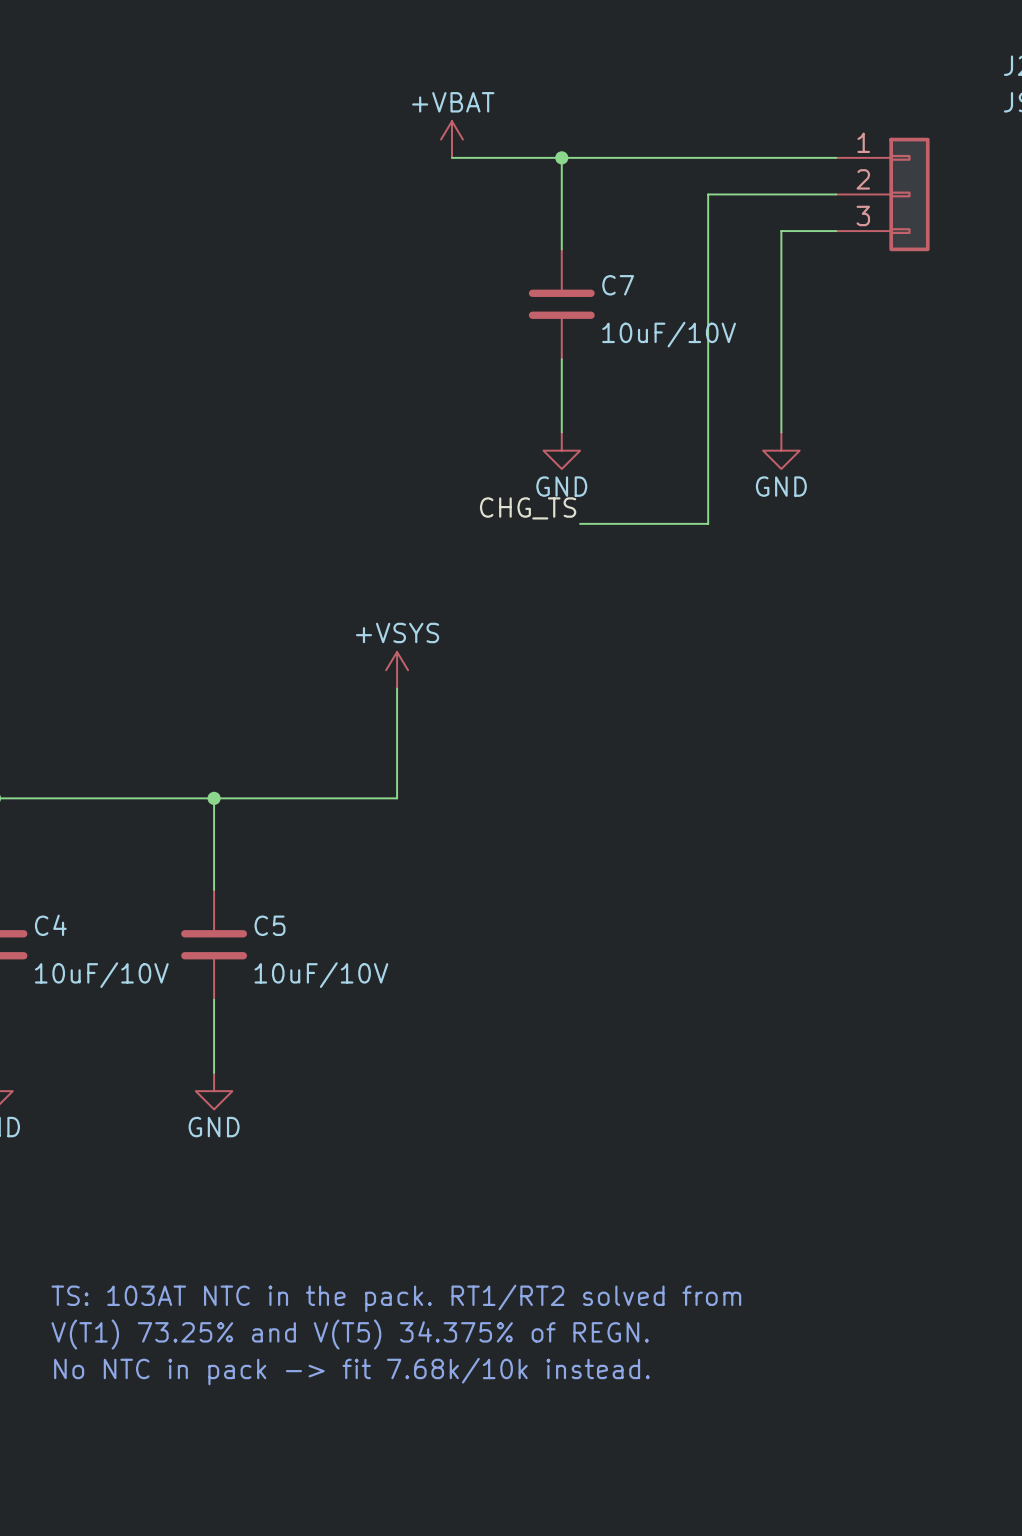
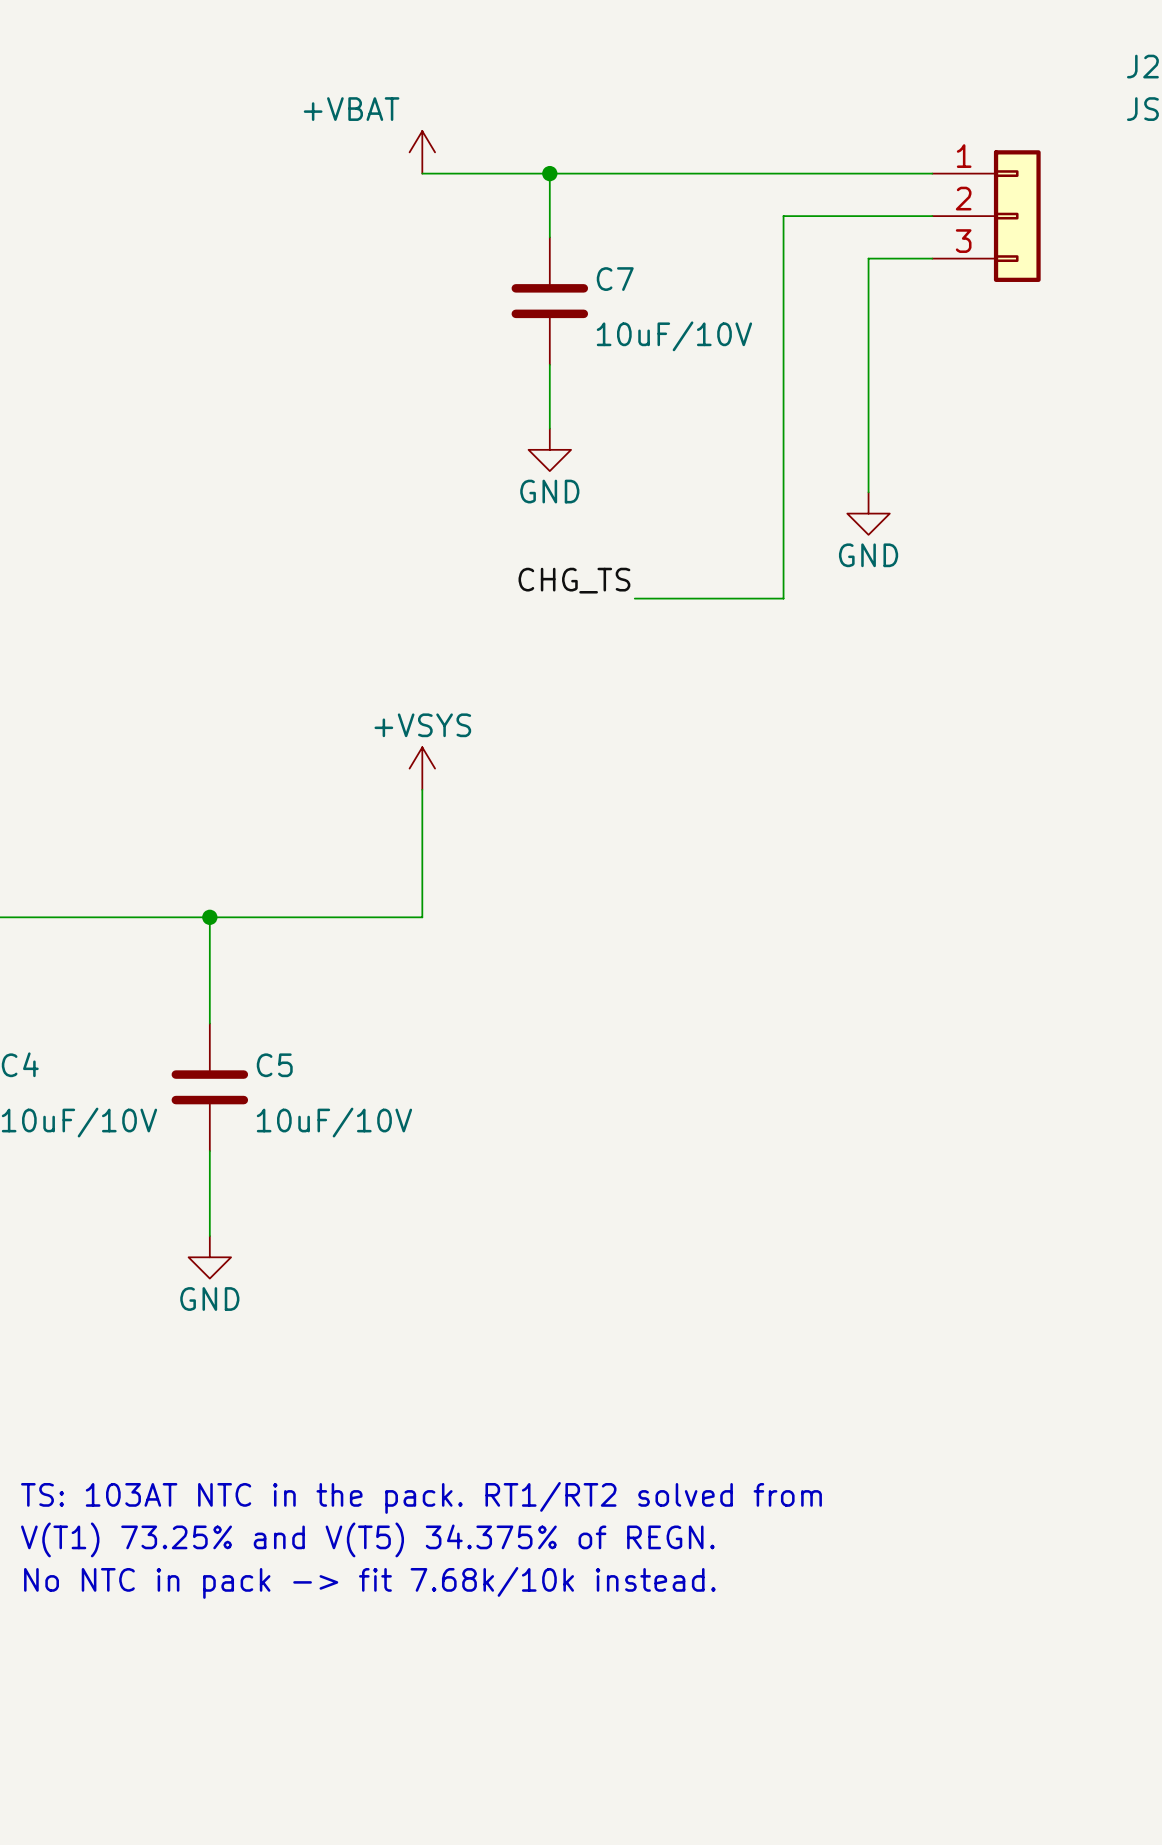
power symbol text position: +VBAT (453, 102) -> +VBAT (351, 109)
power symbol position: +VBAT (451, 139) -> +VBAT (422, 152)
wire: none -> (422, 173) (486, 173)
wire: none -> (549, 173) (549, 237)
wire: (561, 157) (561, 249) -> none
junction position: (561, 157) -> (549, 173)
C7 position: (561, 304) -> (549, 301)
wire: none -> (549, 364) (549, 428)
wire: (561, 359) (561, 432) -> none
power symbol position: GND (561, 450) -> GND (549, 449)

